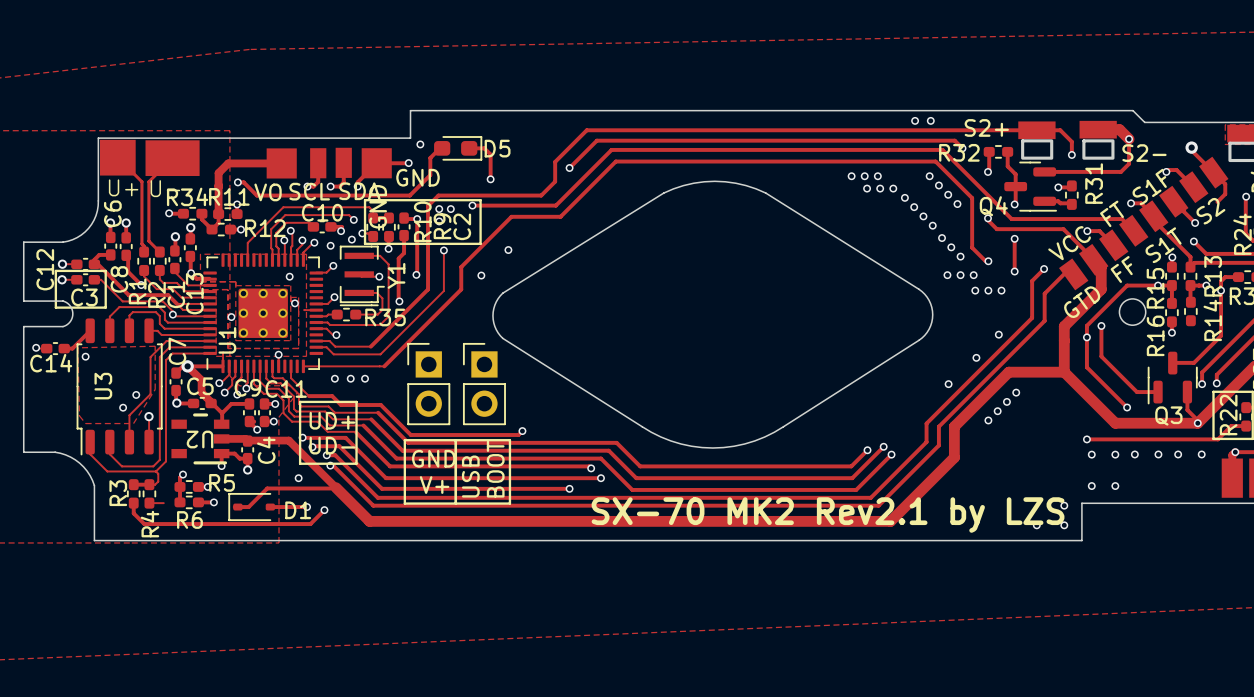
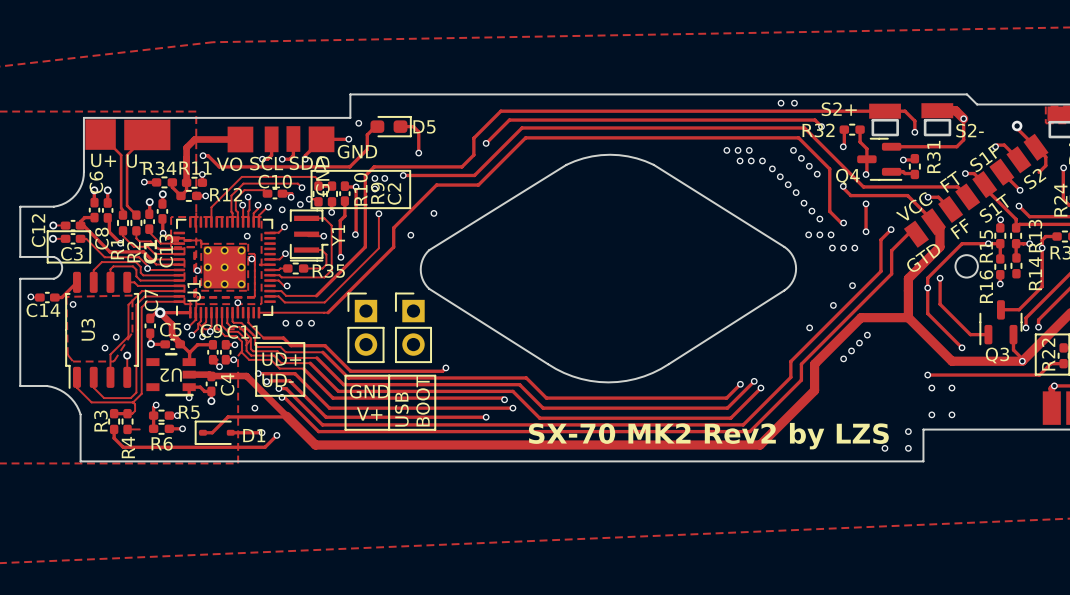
via: (1134, 454) -> none
via: (1158, 454) -> none
via: (1178, 454) -> none
via: (1201, 454) -> none
text: SX-70 MK2 Rev2.1 by LZS (828, 515) -> SX-70 MK2 Rev2 by LZS (708, 436)

